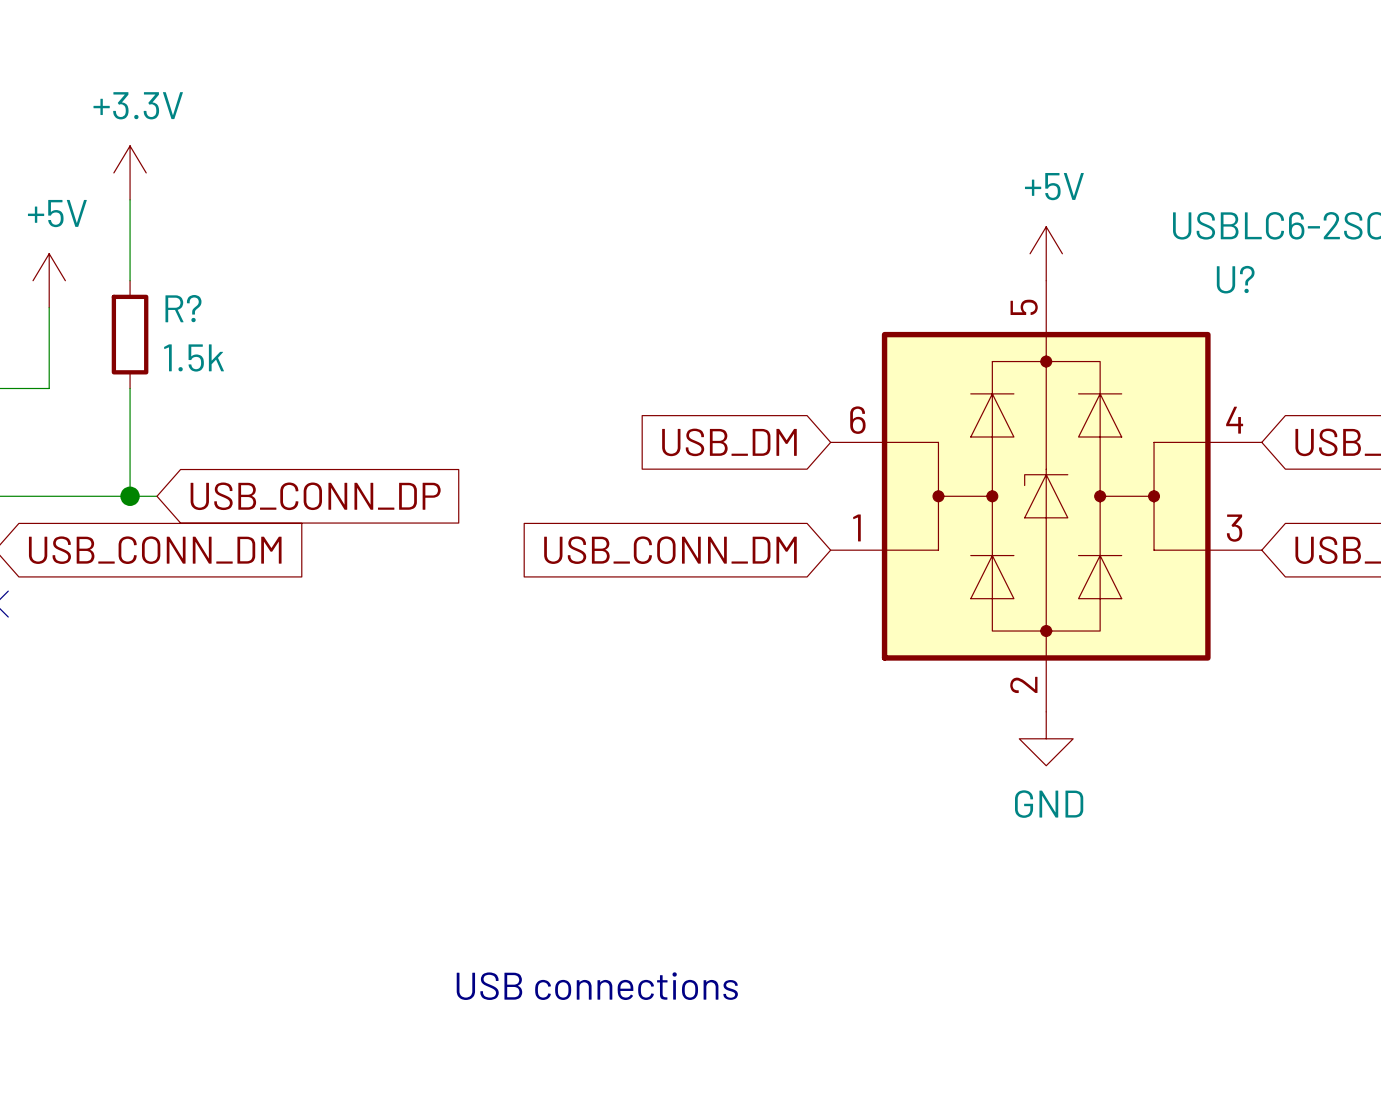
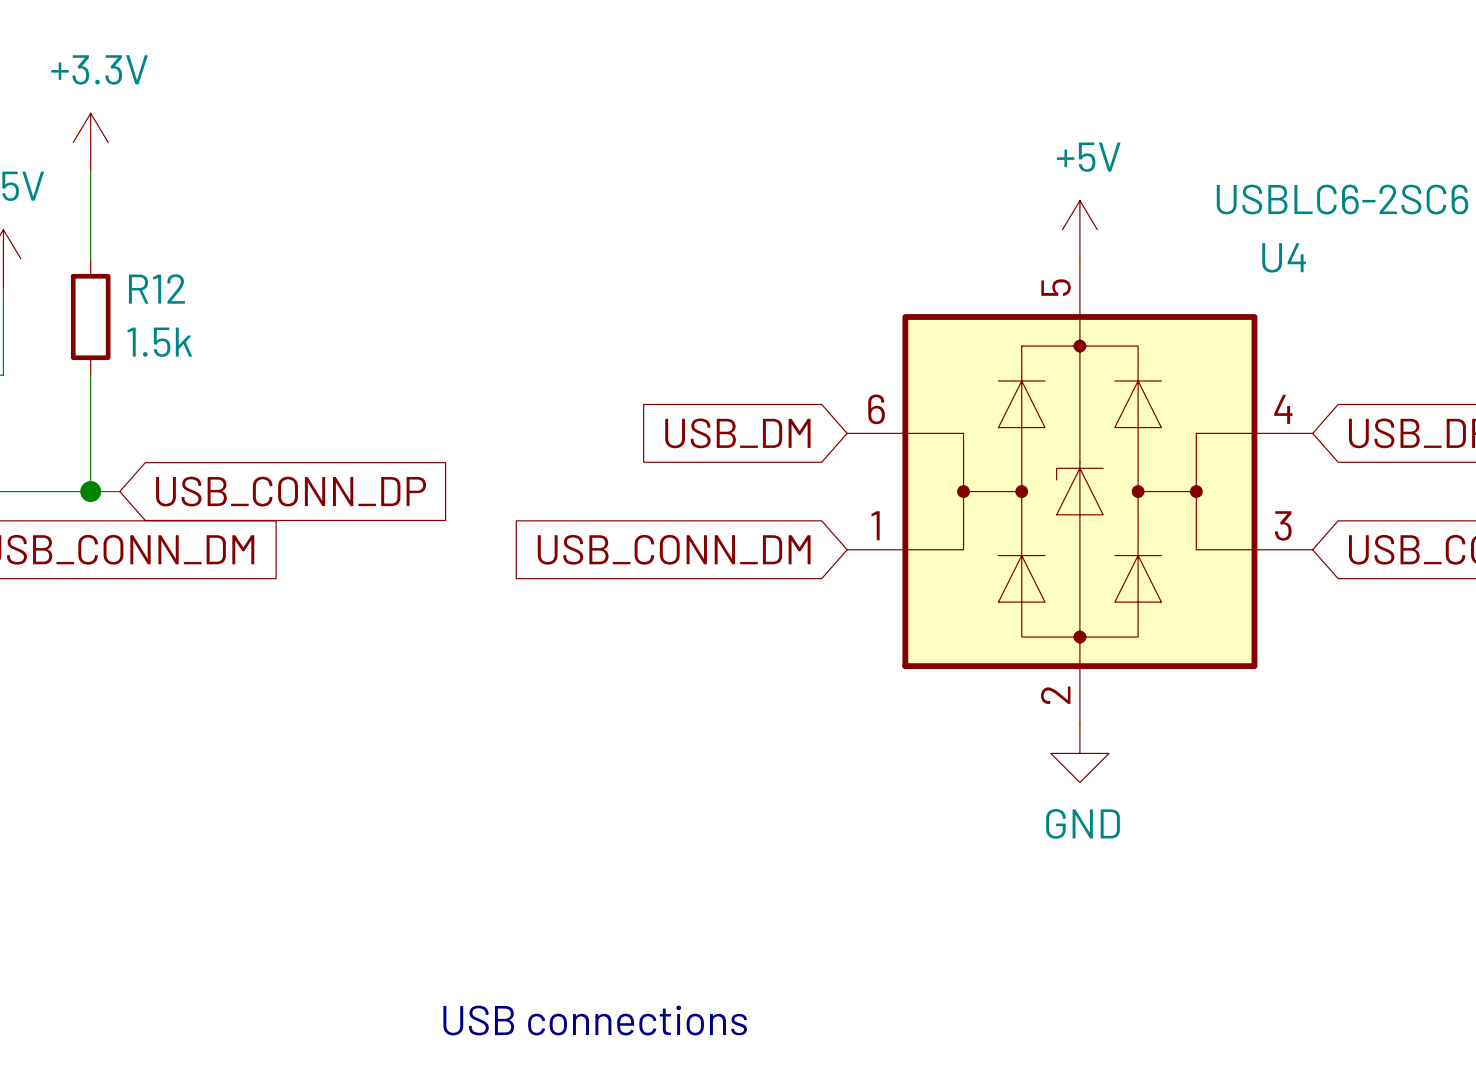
U? name: U? (1235, 279) -> U4 (1284, 257)
R? name: R? (183, 308) -> R12 (156, 288)

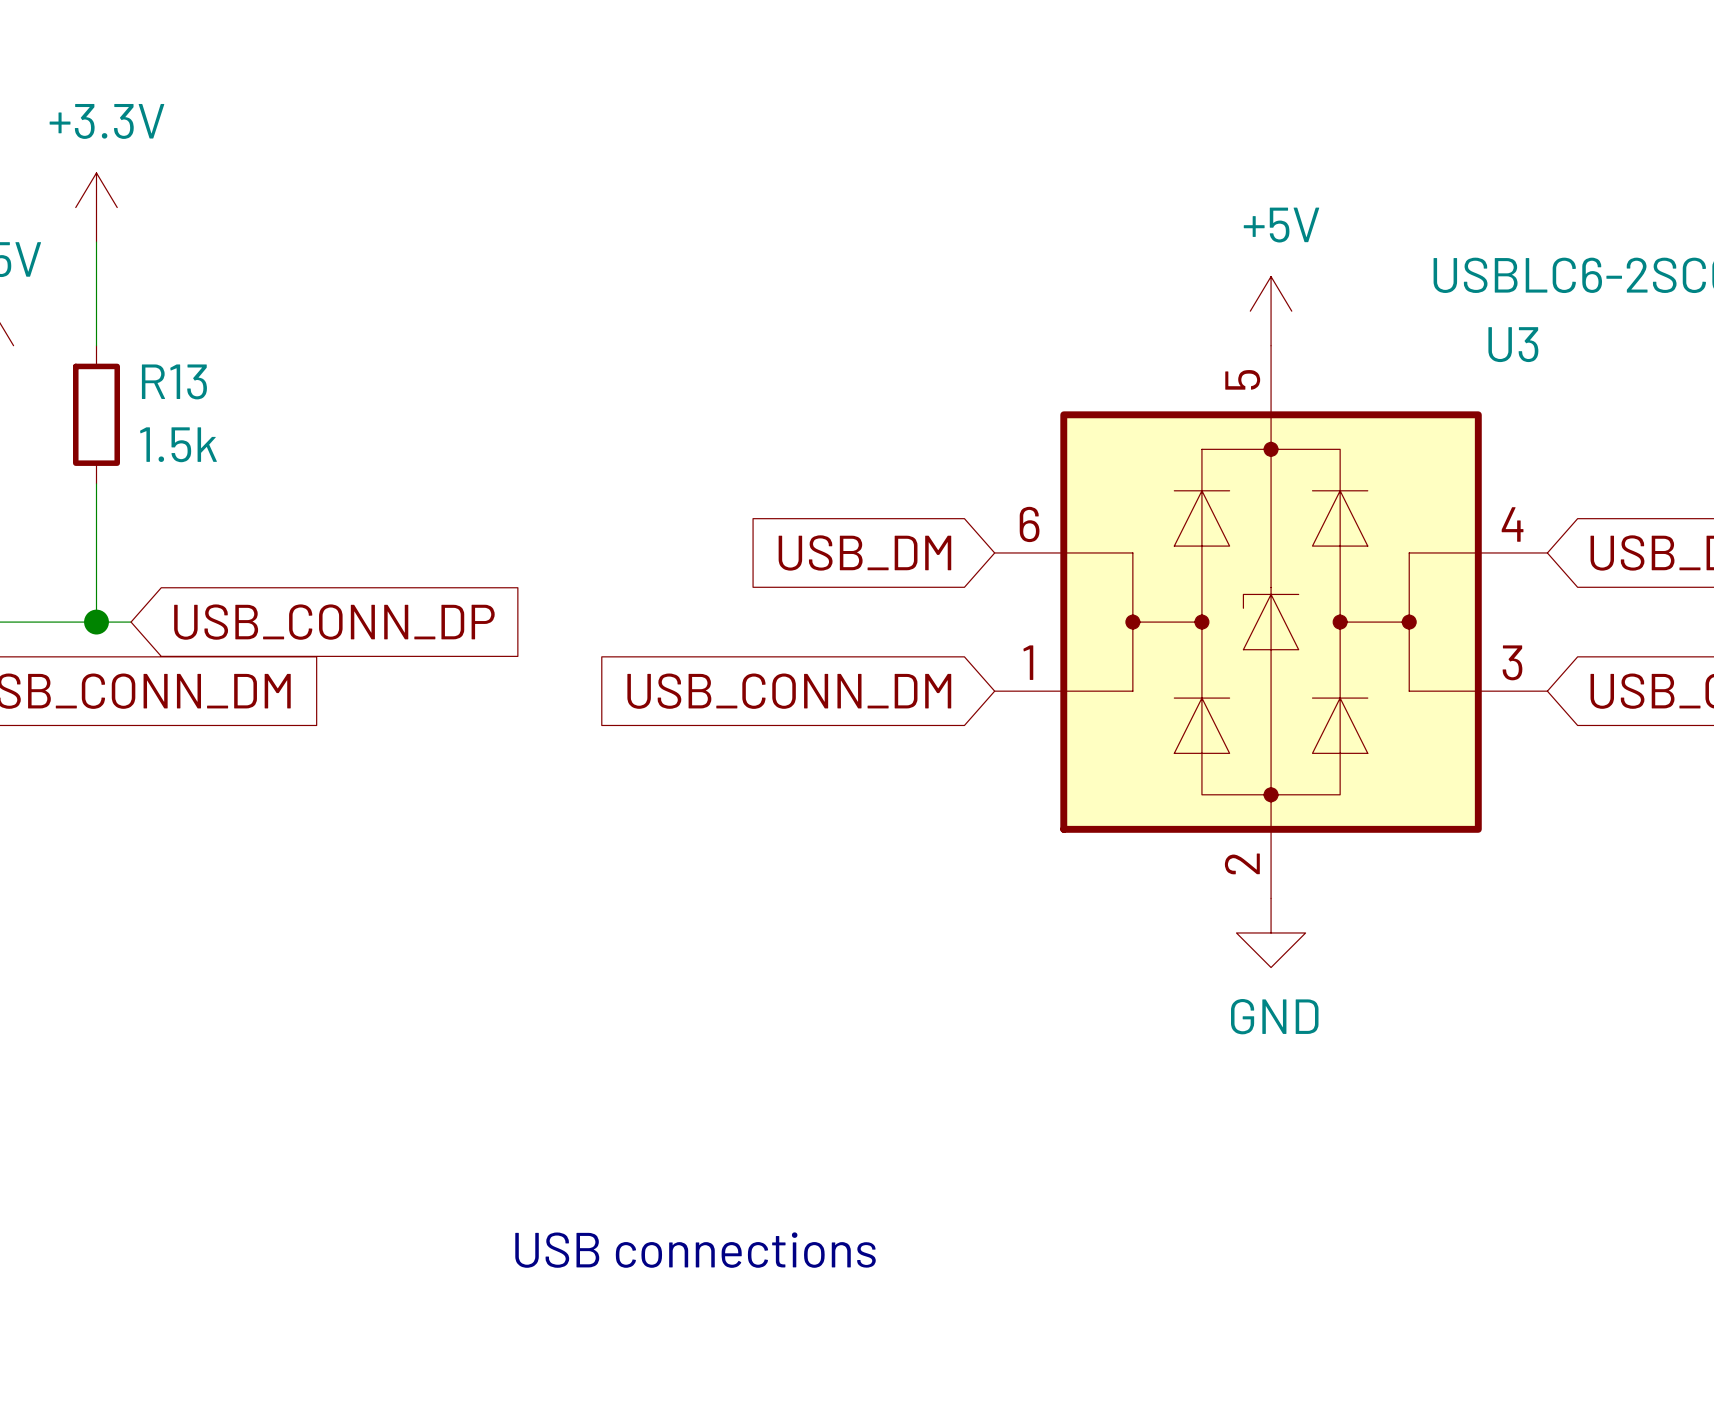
U4 name: U4 (1284, 257) -> U3 (1513, 344)
R12 name: R12 (156, 288) -> R13 (174, 381)

